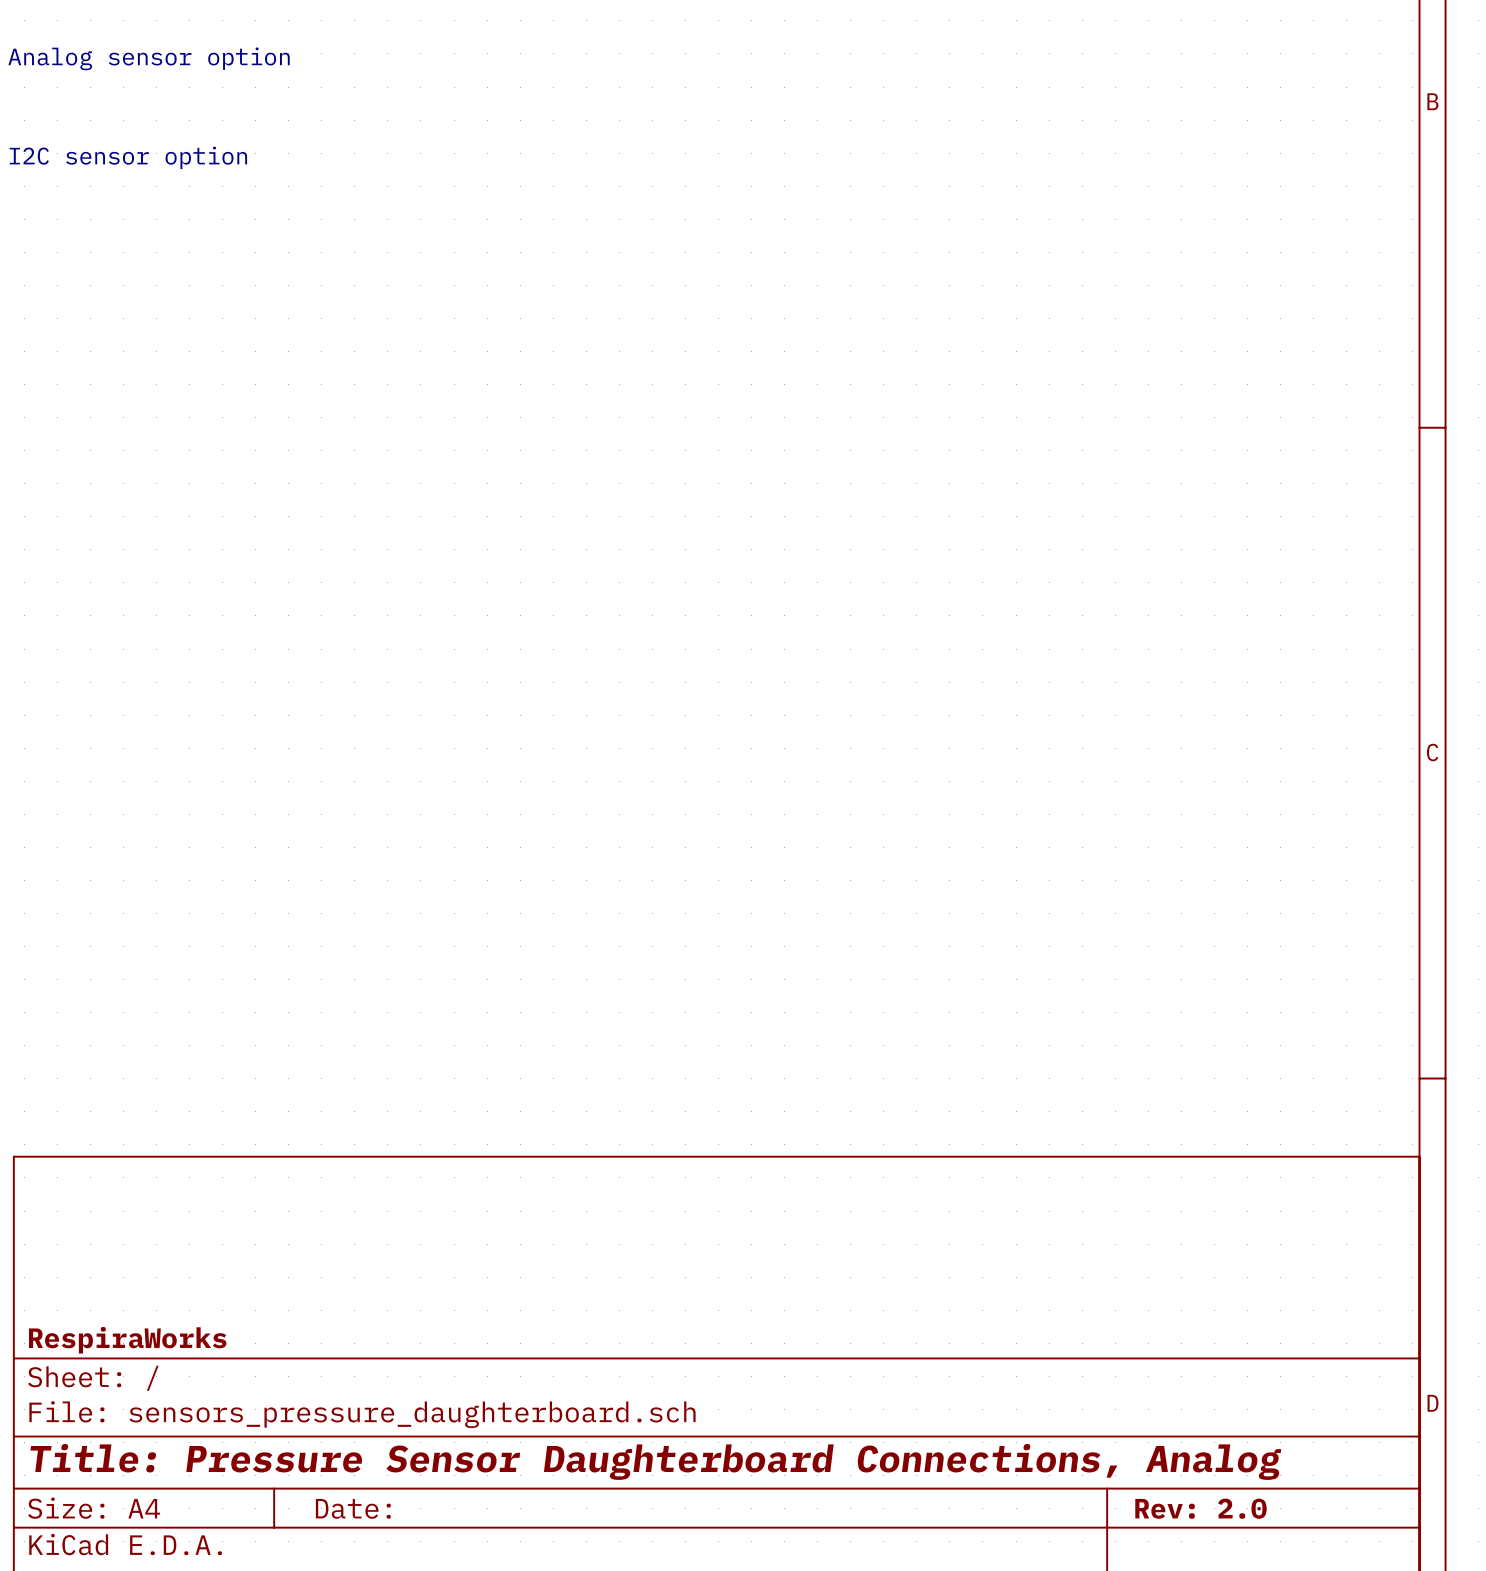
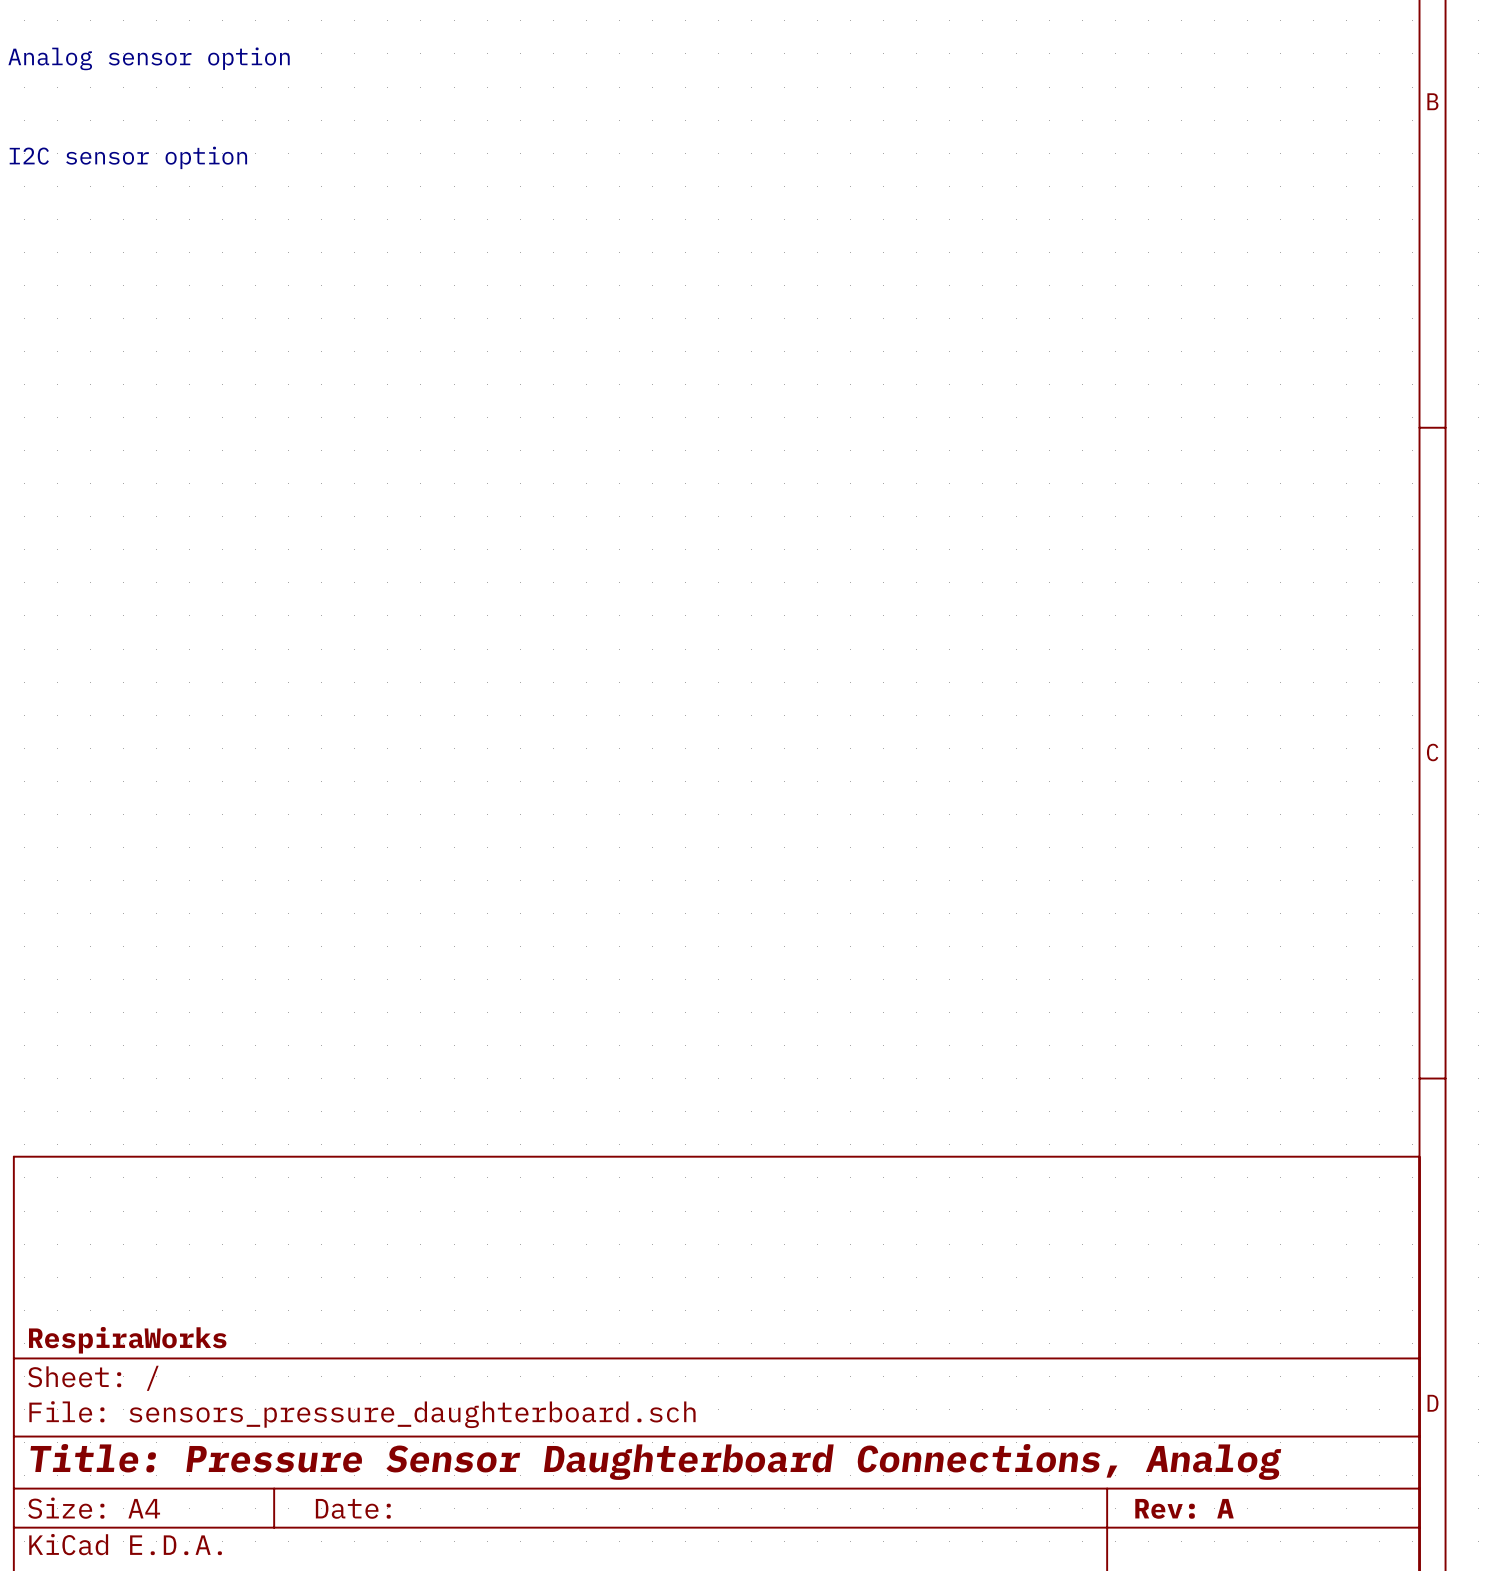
title block: Rev: 2.0 (1200, 1508) -> Rev: A (1184, 1508)

